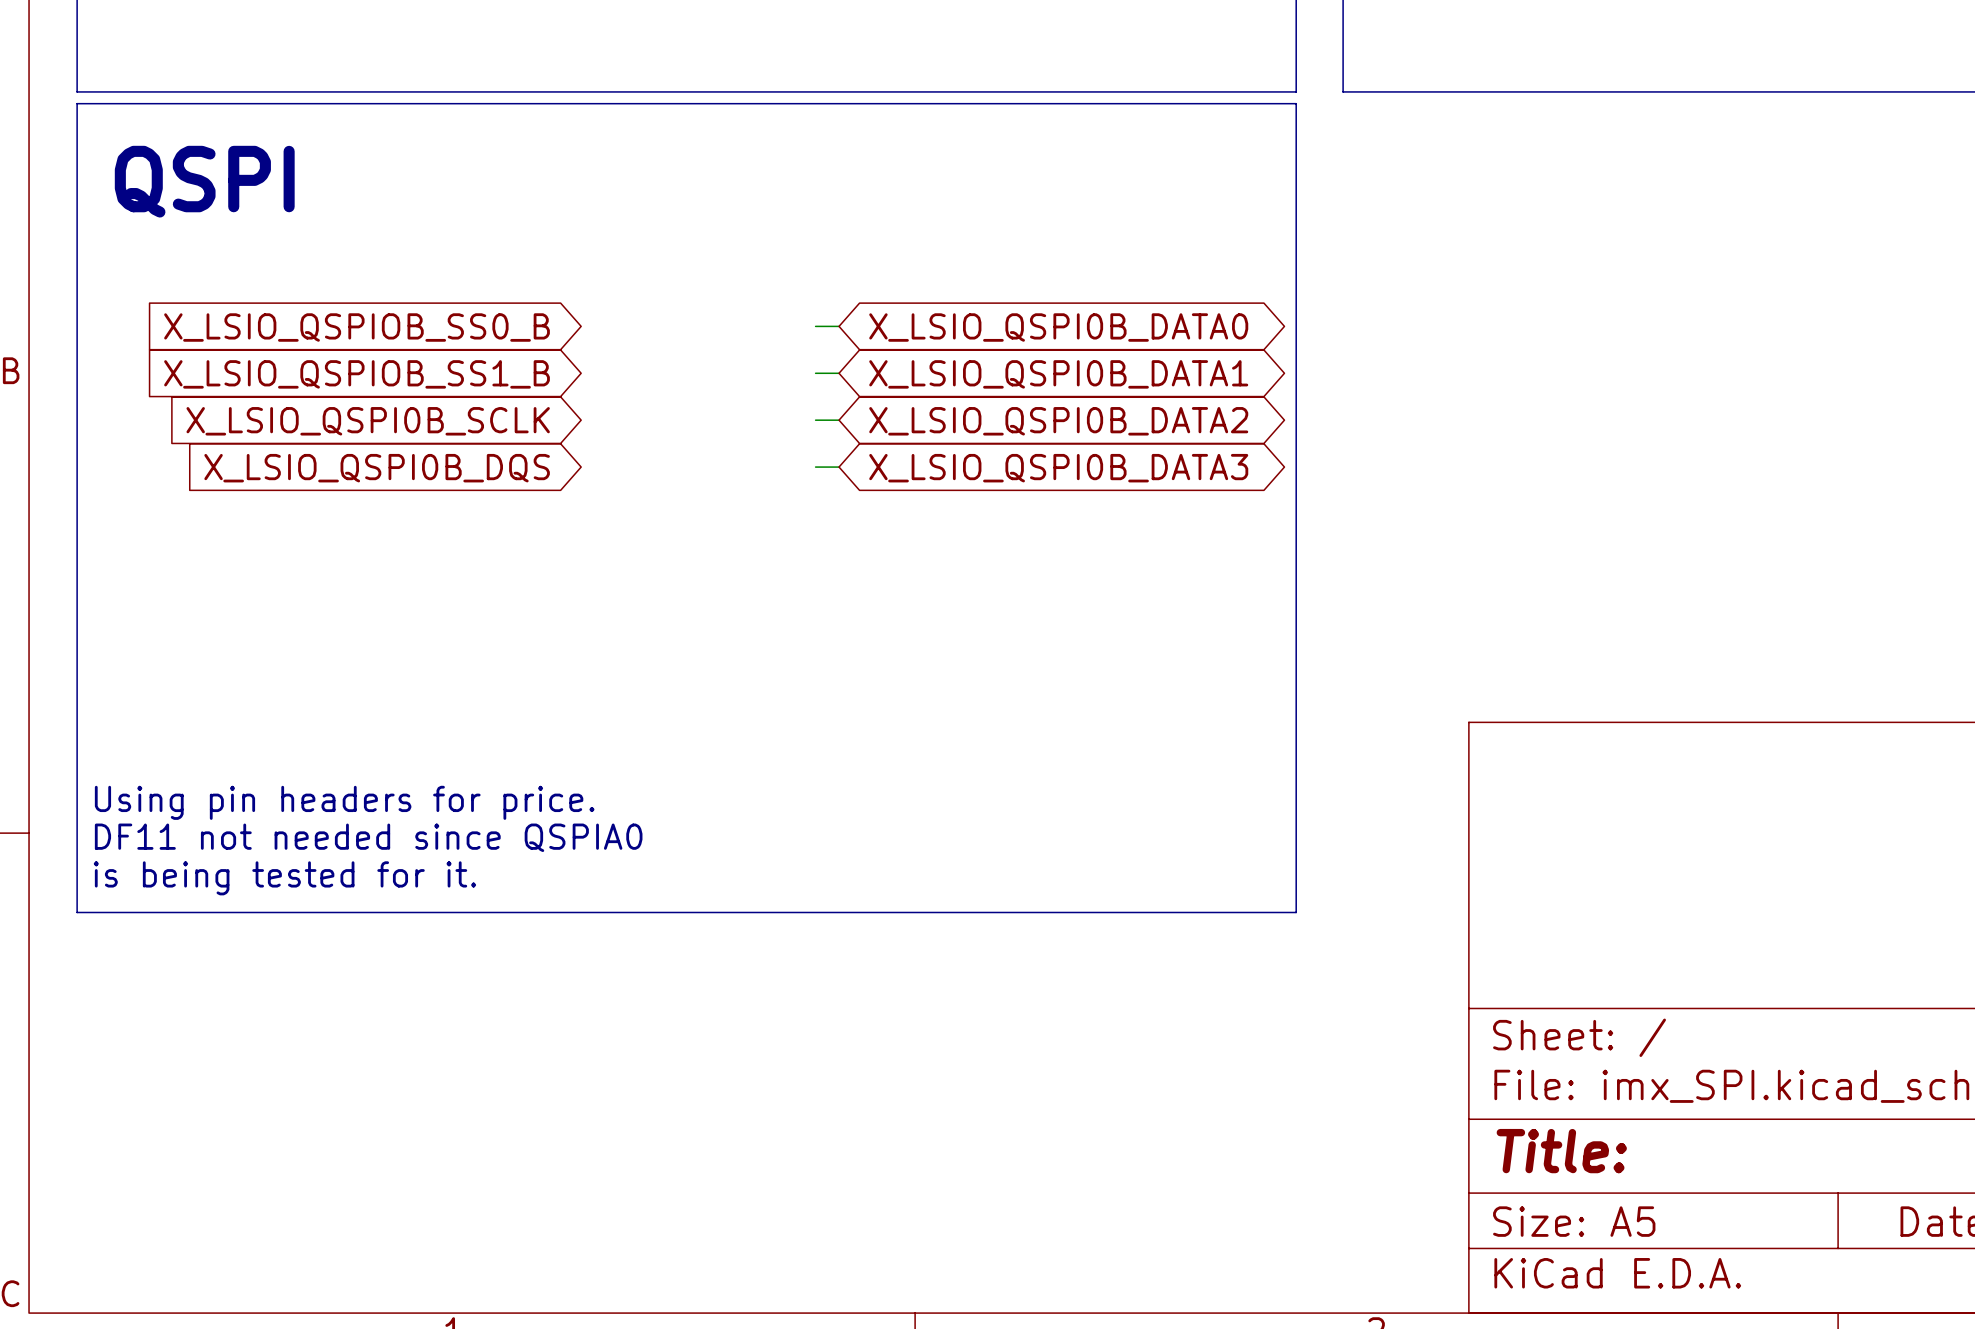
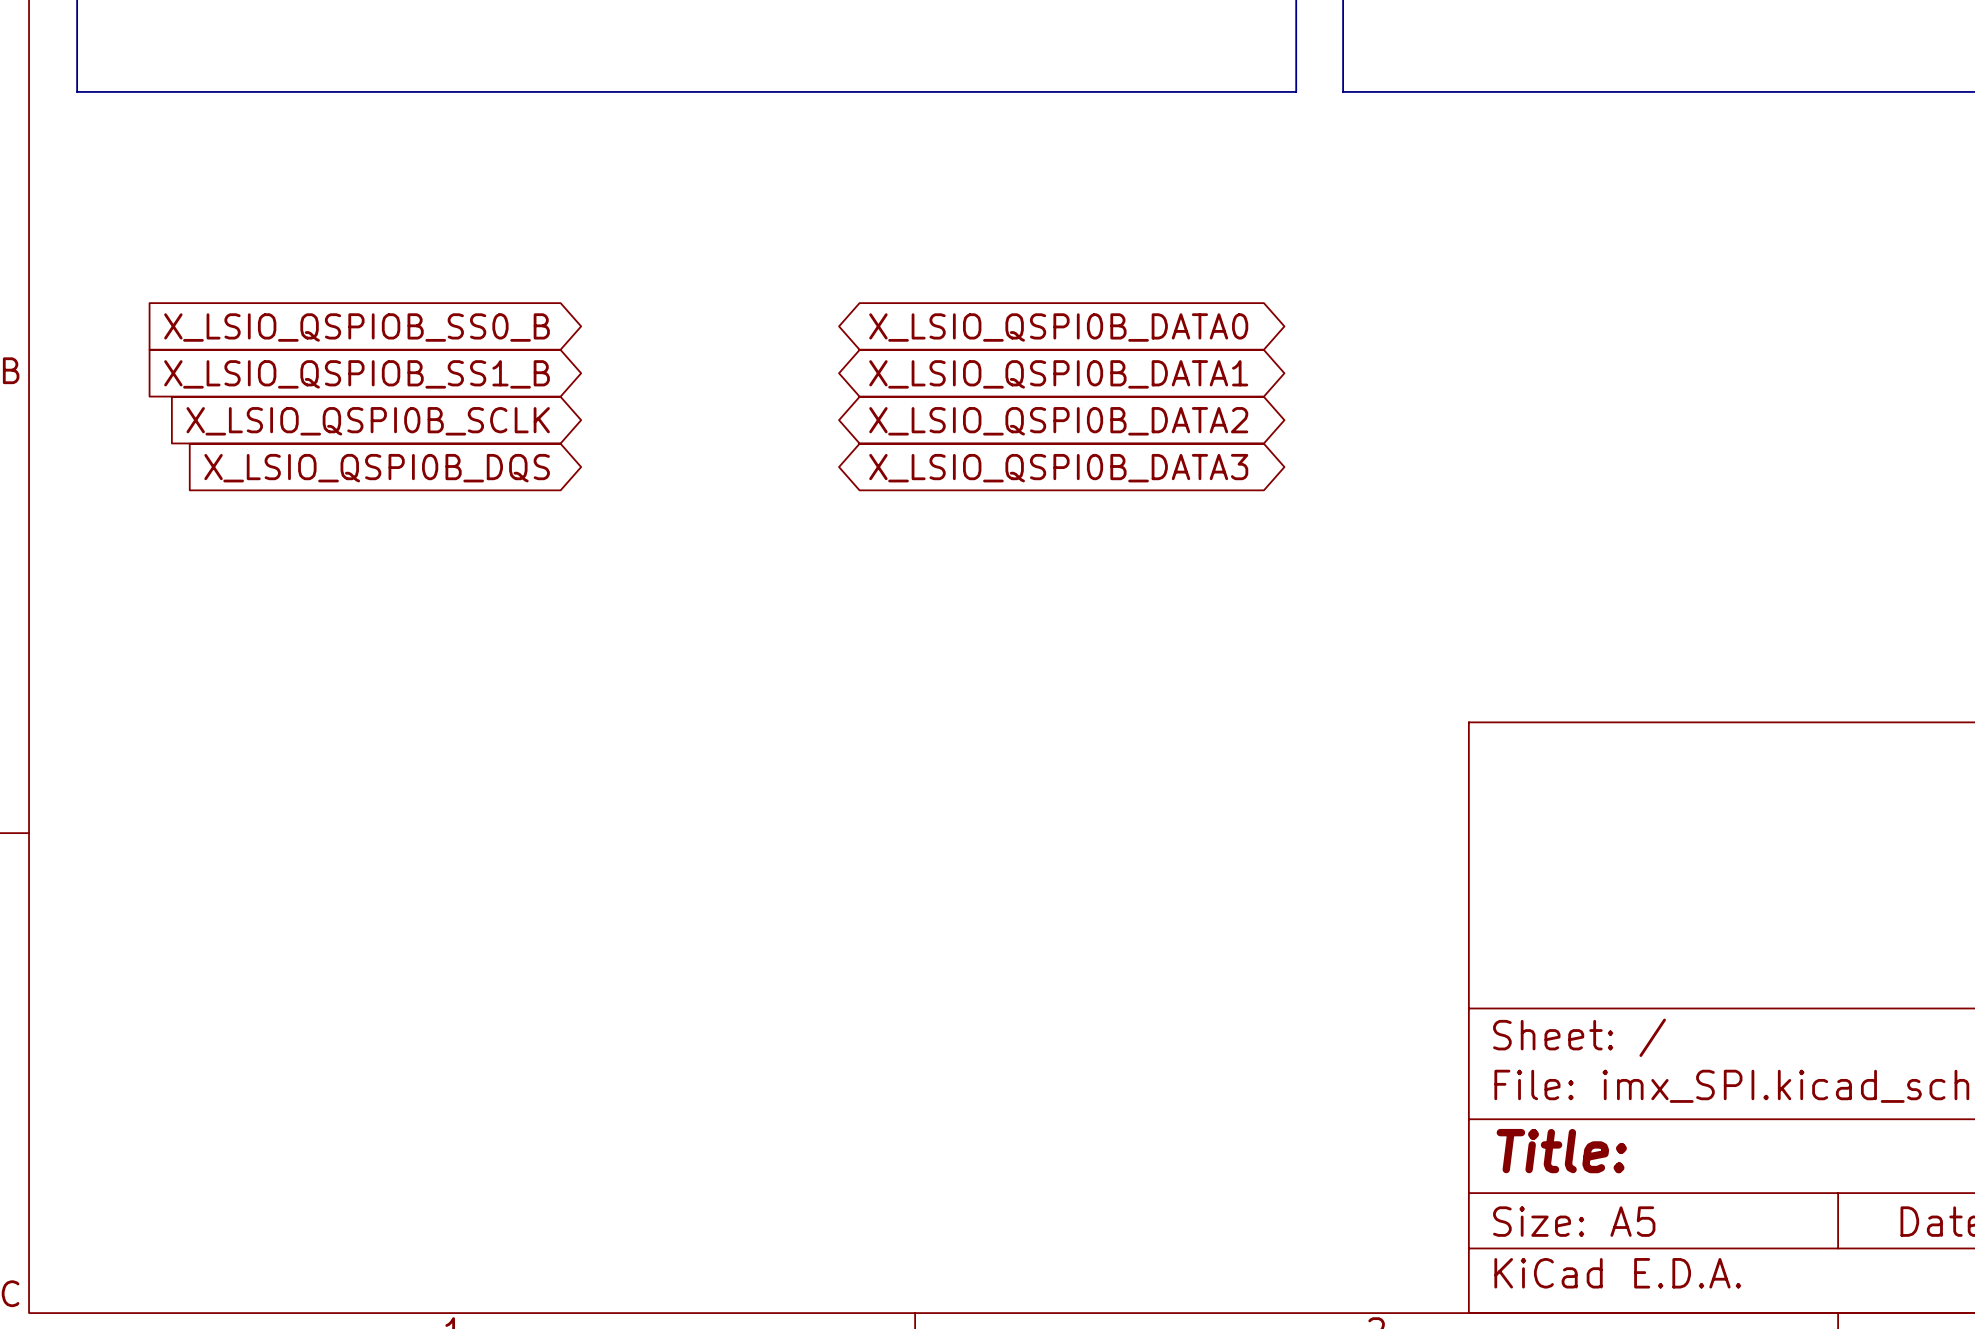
line: (77, 103) (77, 912) (1296, 912) (1296, 103) (77, 103) -> none
text: QSPI (204, 181) -> none
wire: (815, 326) (839, 326) -> none
wire: (815, 373) (839, 373) -> none
wire: (815, 420) (839, 420) -> none
wire: (815, 467) (839, 467) -> none
text: Using pin headers for price. (344, 802) -> none
text: DF11 not needed since QSPIA0 (368, 837) -> none
text: is being tested for it. (284, 878) -> none

